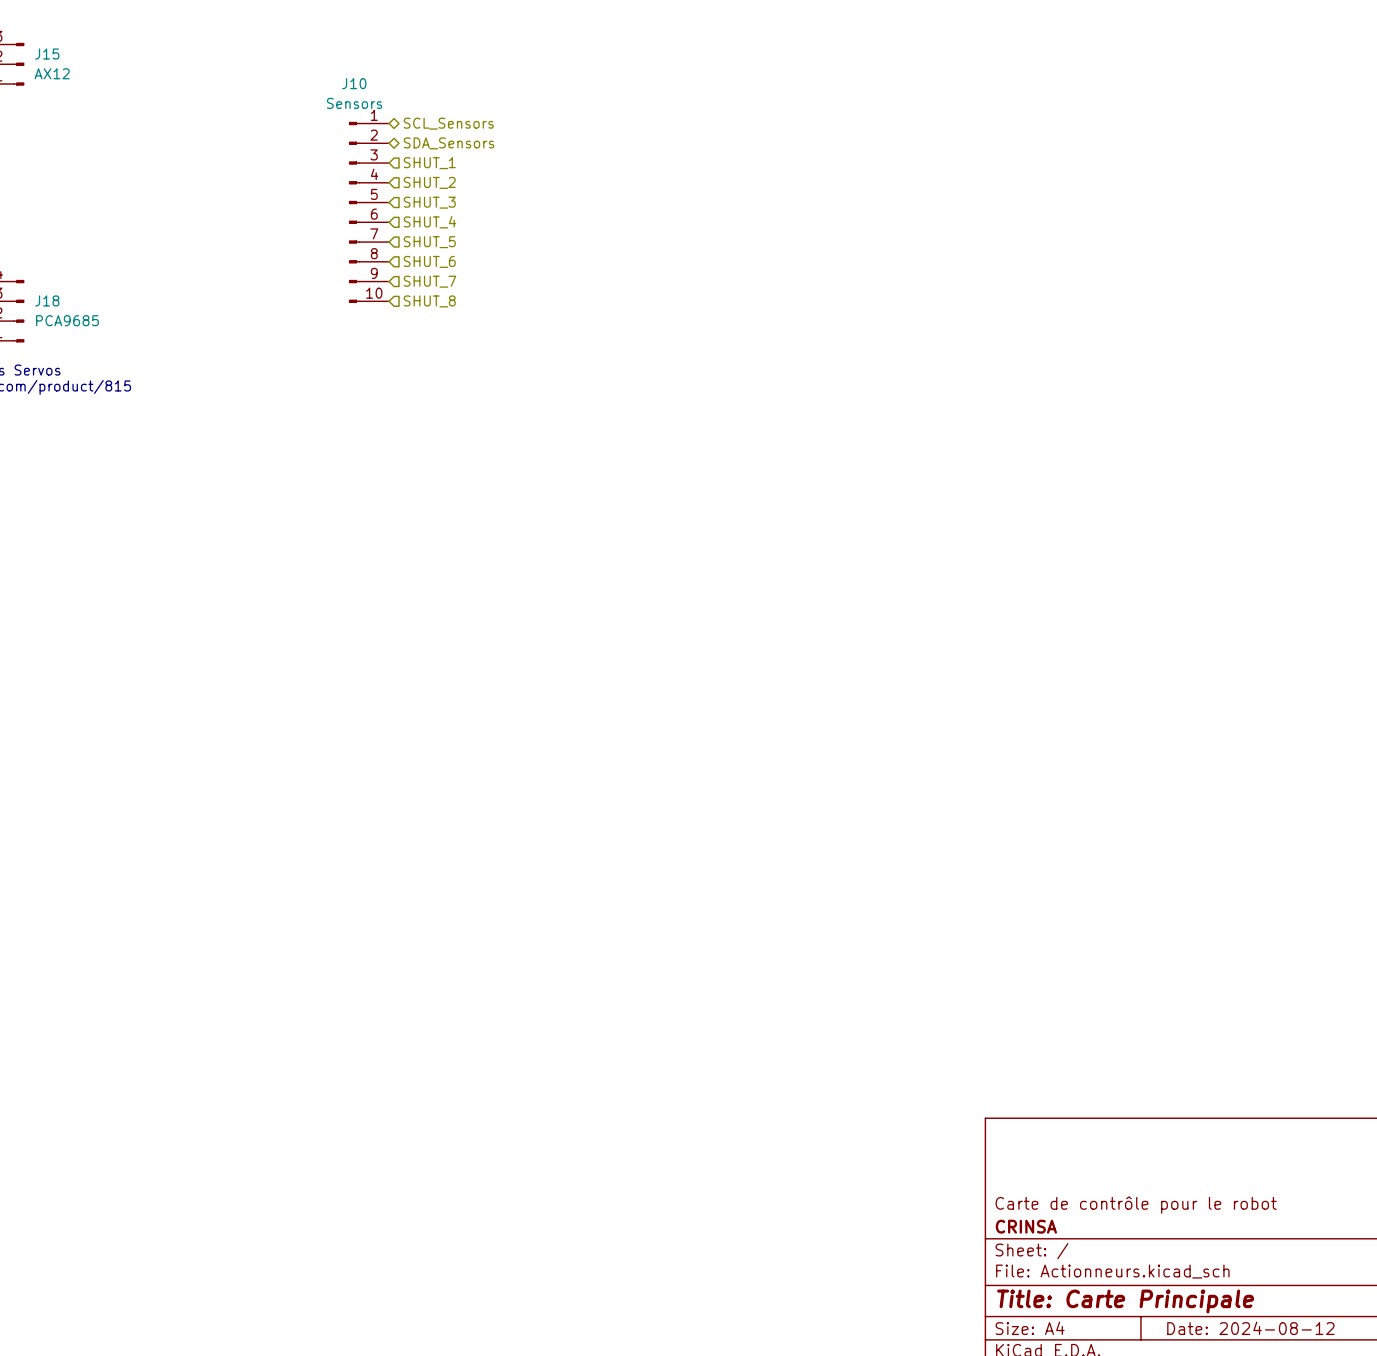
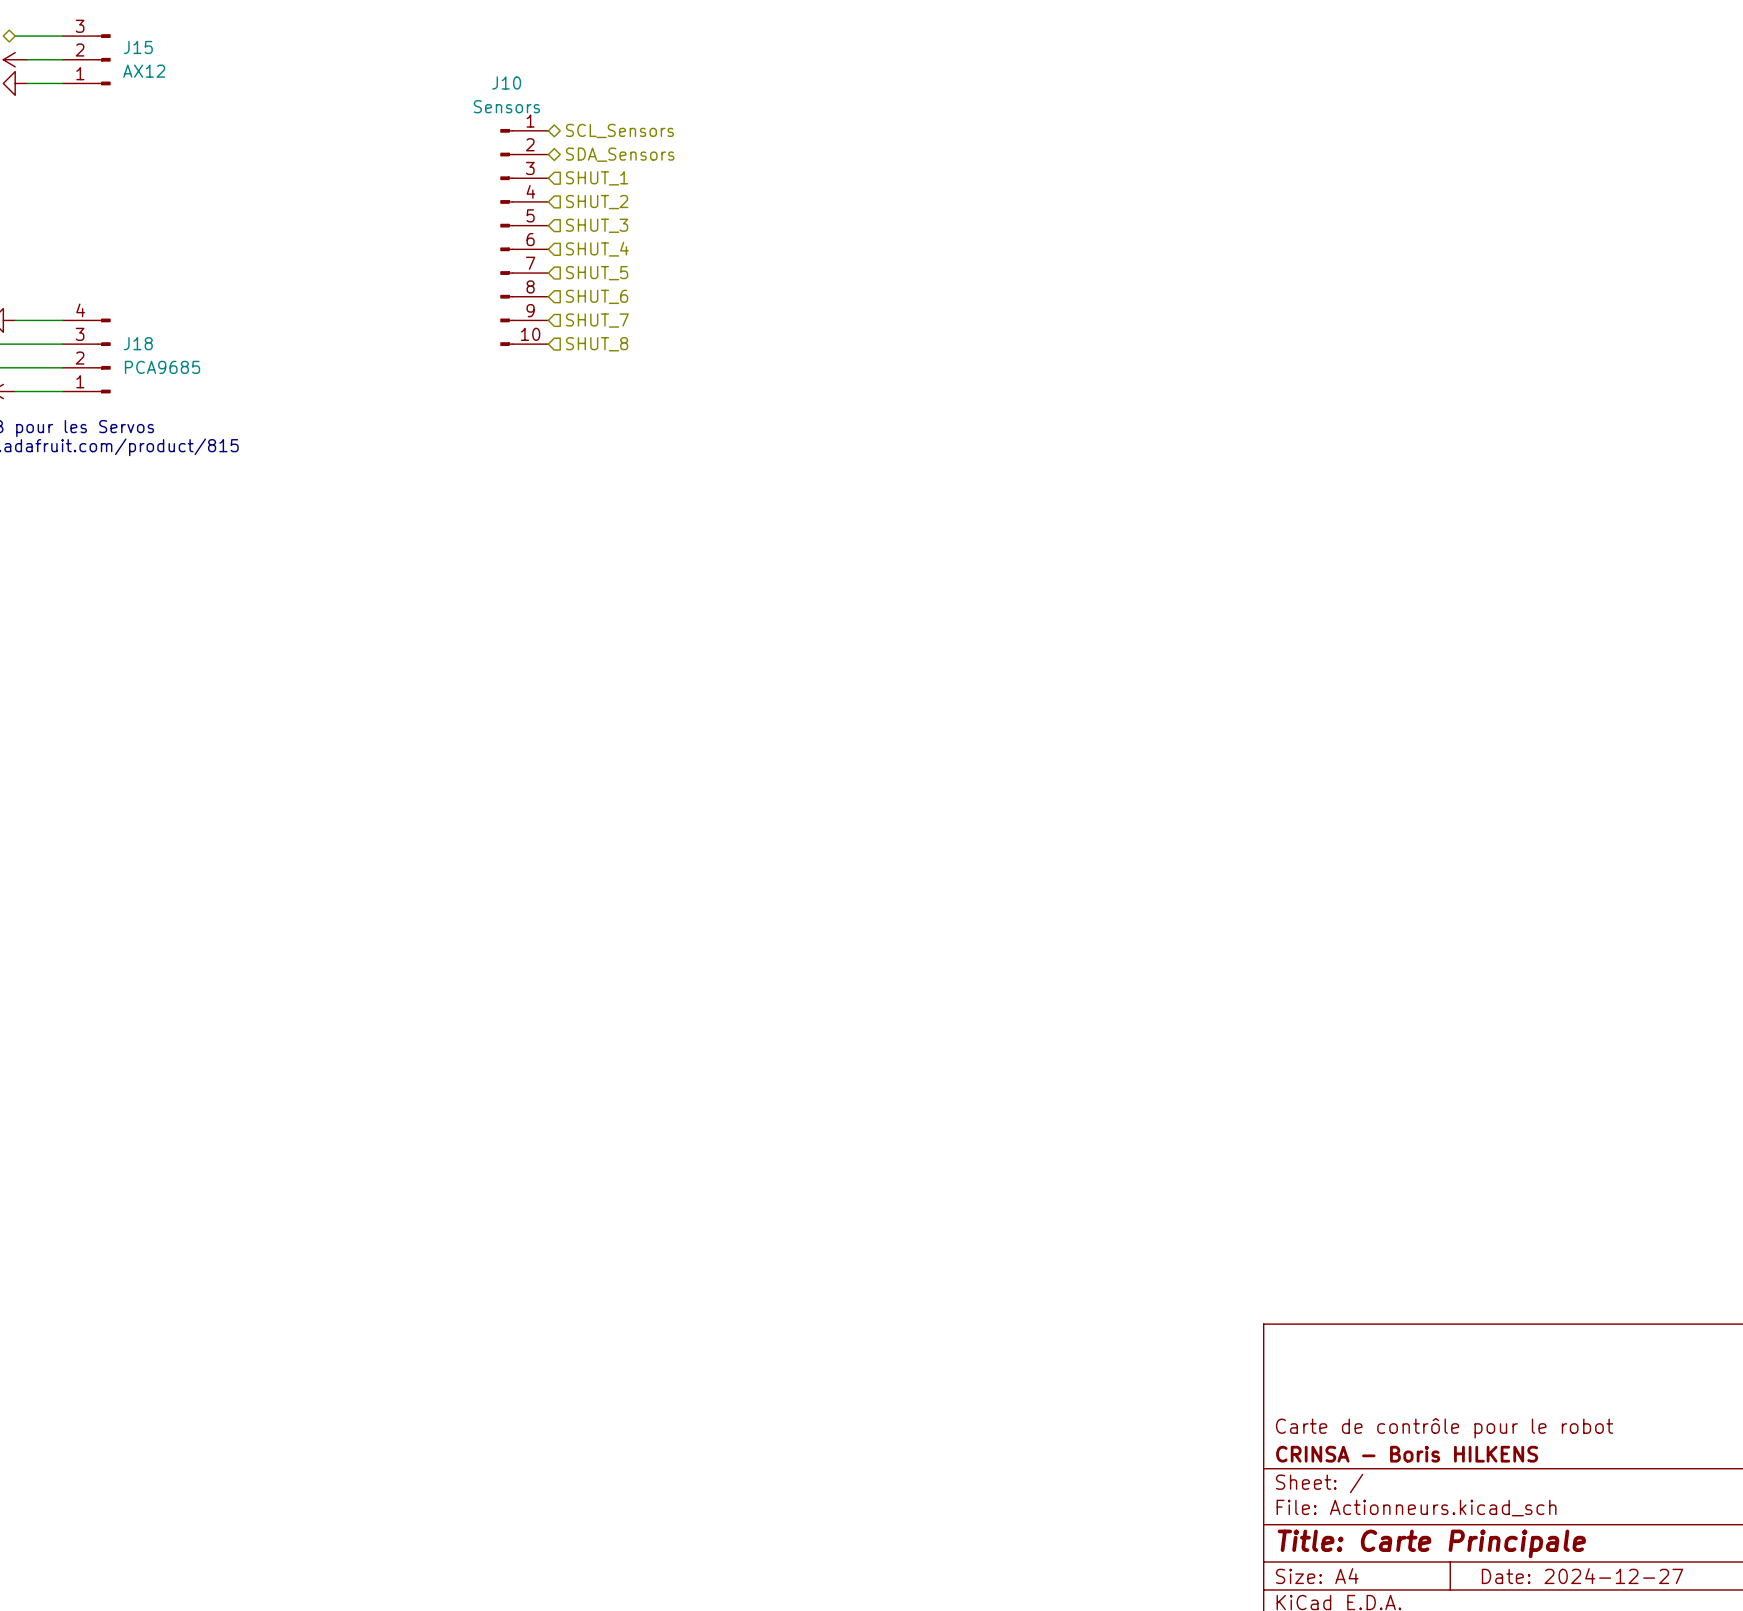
title block: CRINSA (1026, 1226) -> CRINSA - Boris HILKENS (1407, 1454)
title block: Date: 2024-08-12 (1250, 1328) -> Date: 2024-12-27 (1582, 1576)

